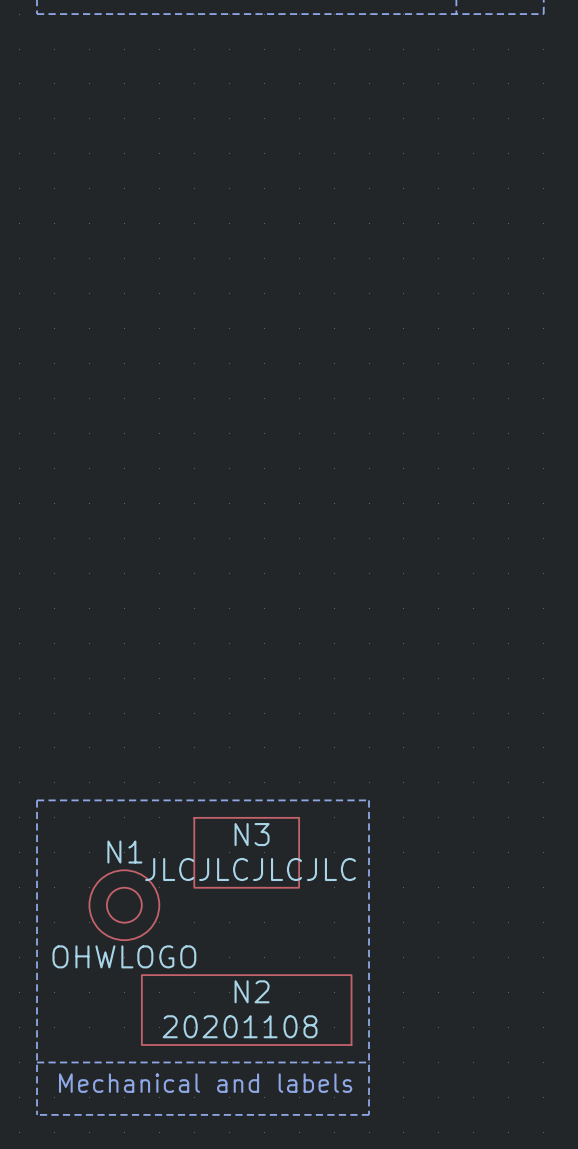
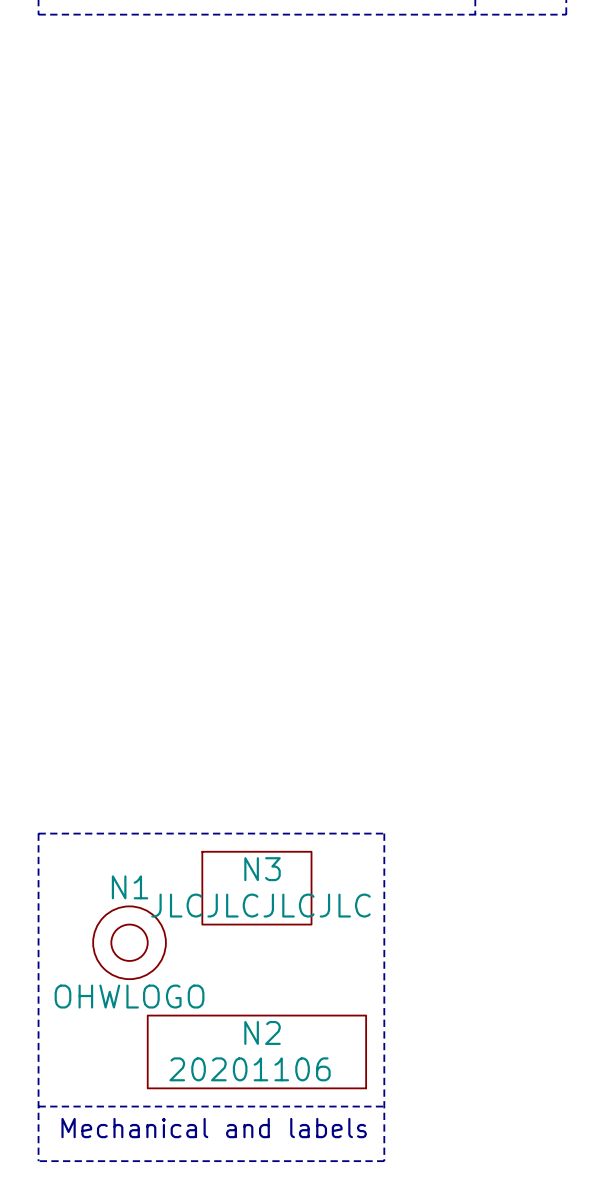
N2 value: 20201108 (240, 1026) -> 20201106 (250, 1069)

